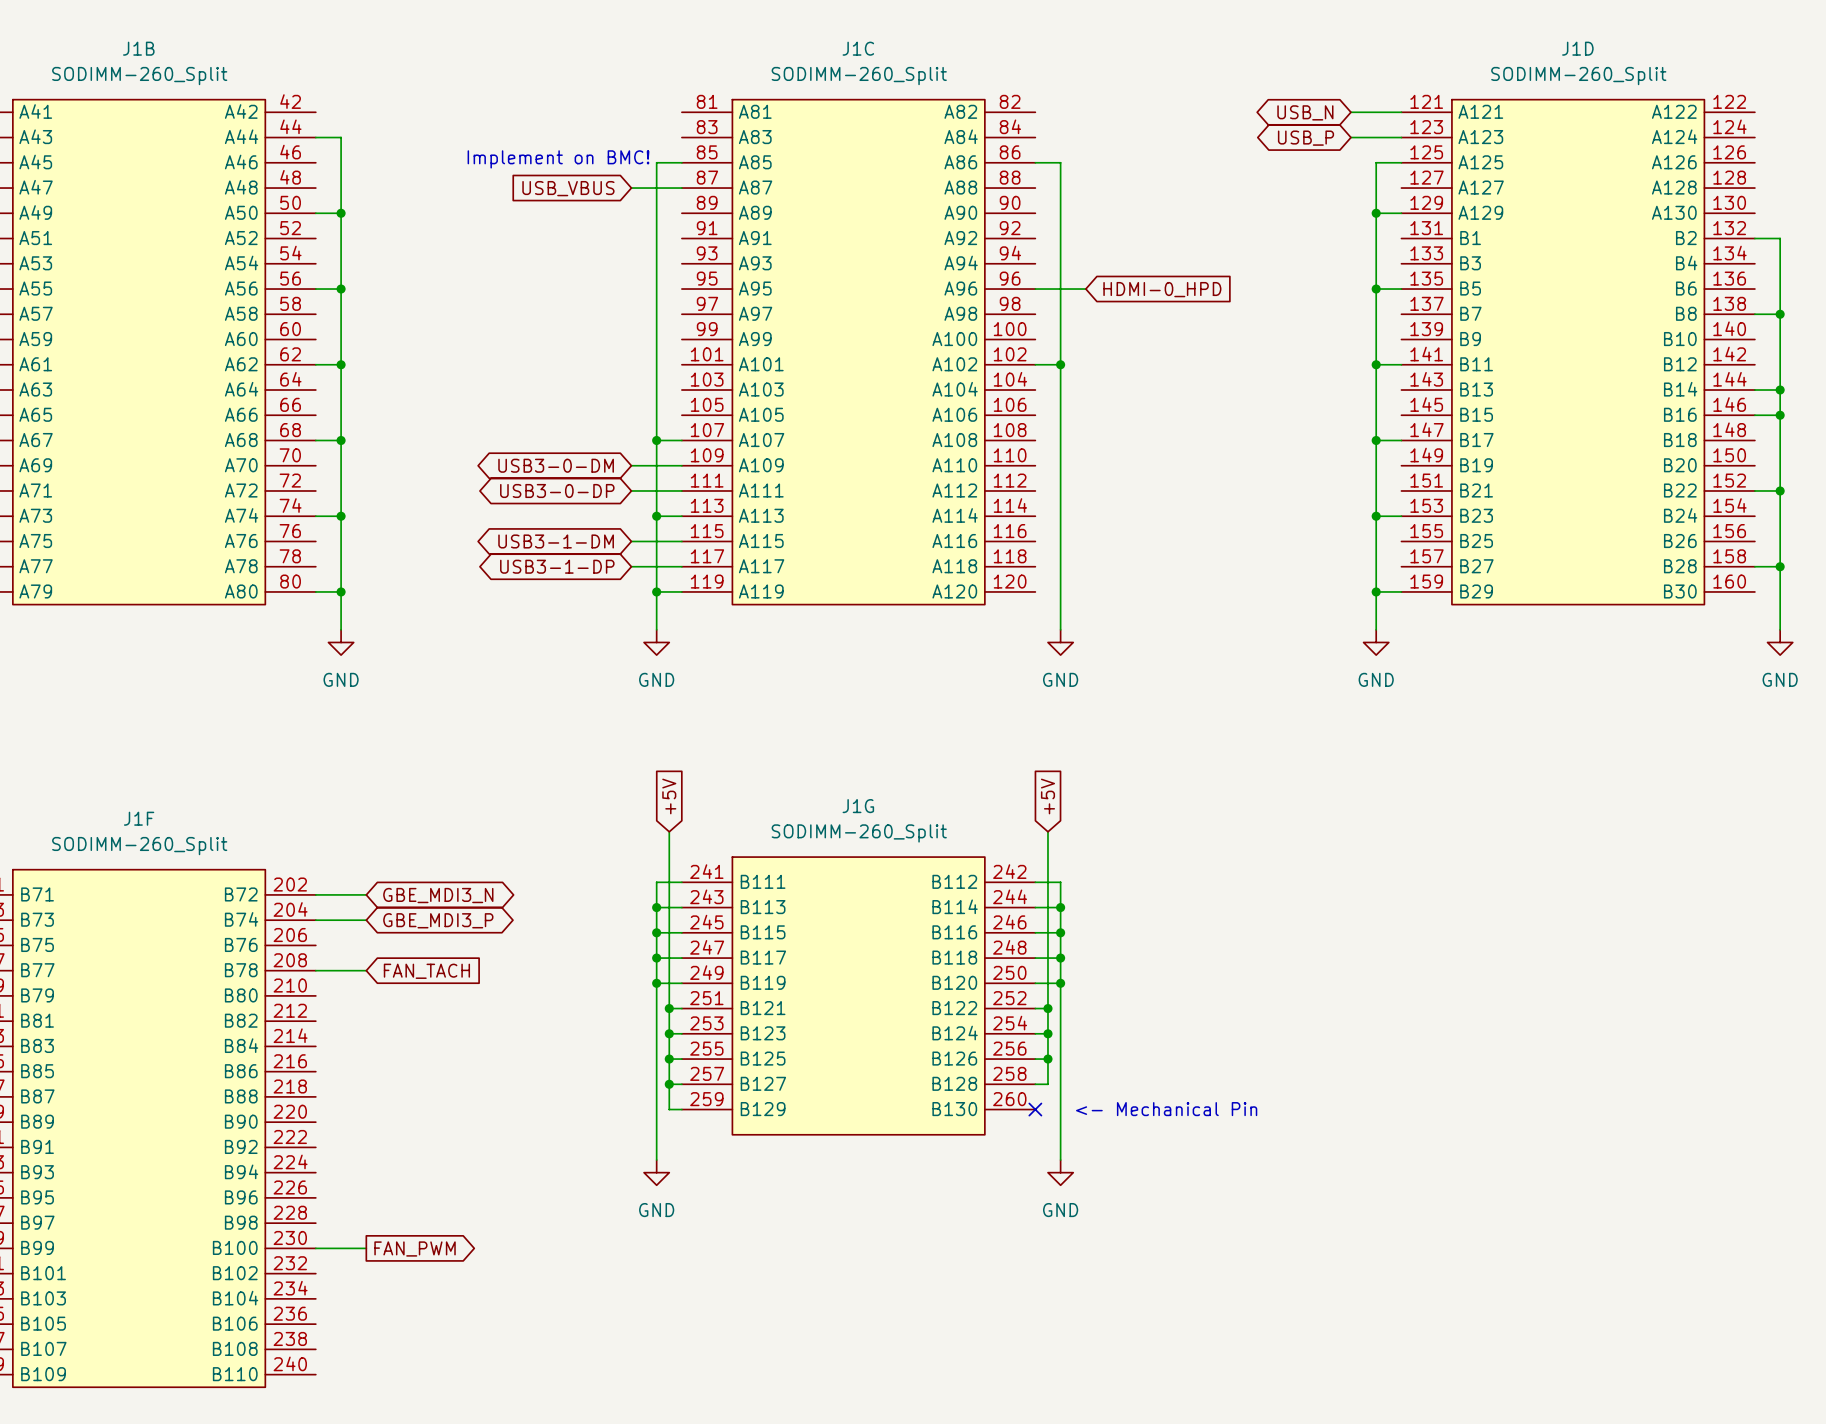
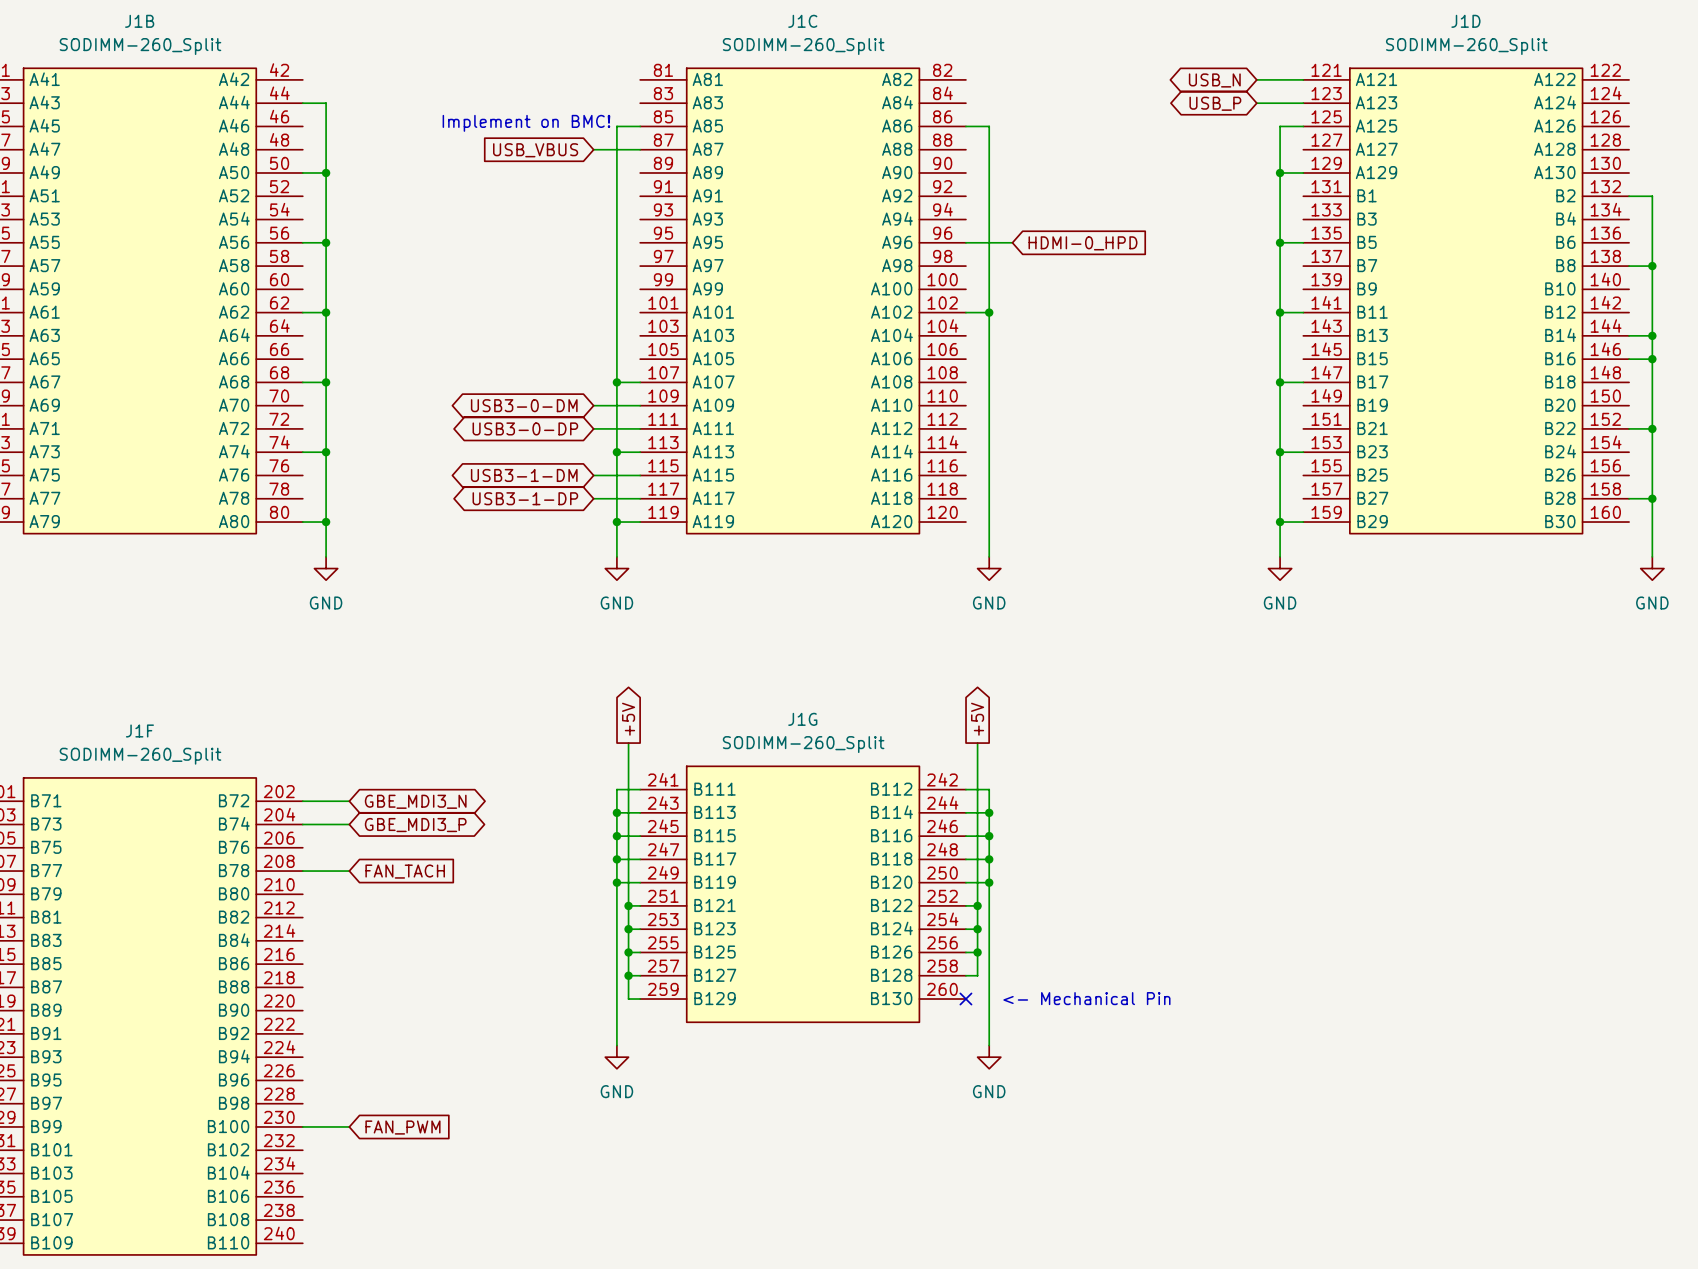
global label shape: input (669, 796) -> output (628, 719)
global label shape: input (1047, 796) -> output (977, 719)
global label shape: output (415, 1248) -> input (402, 1127)

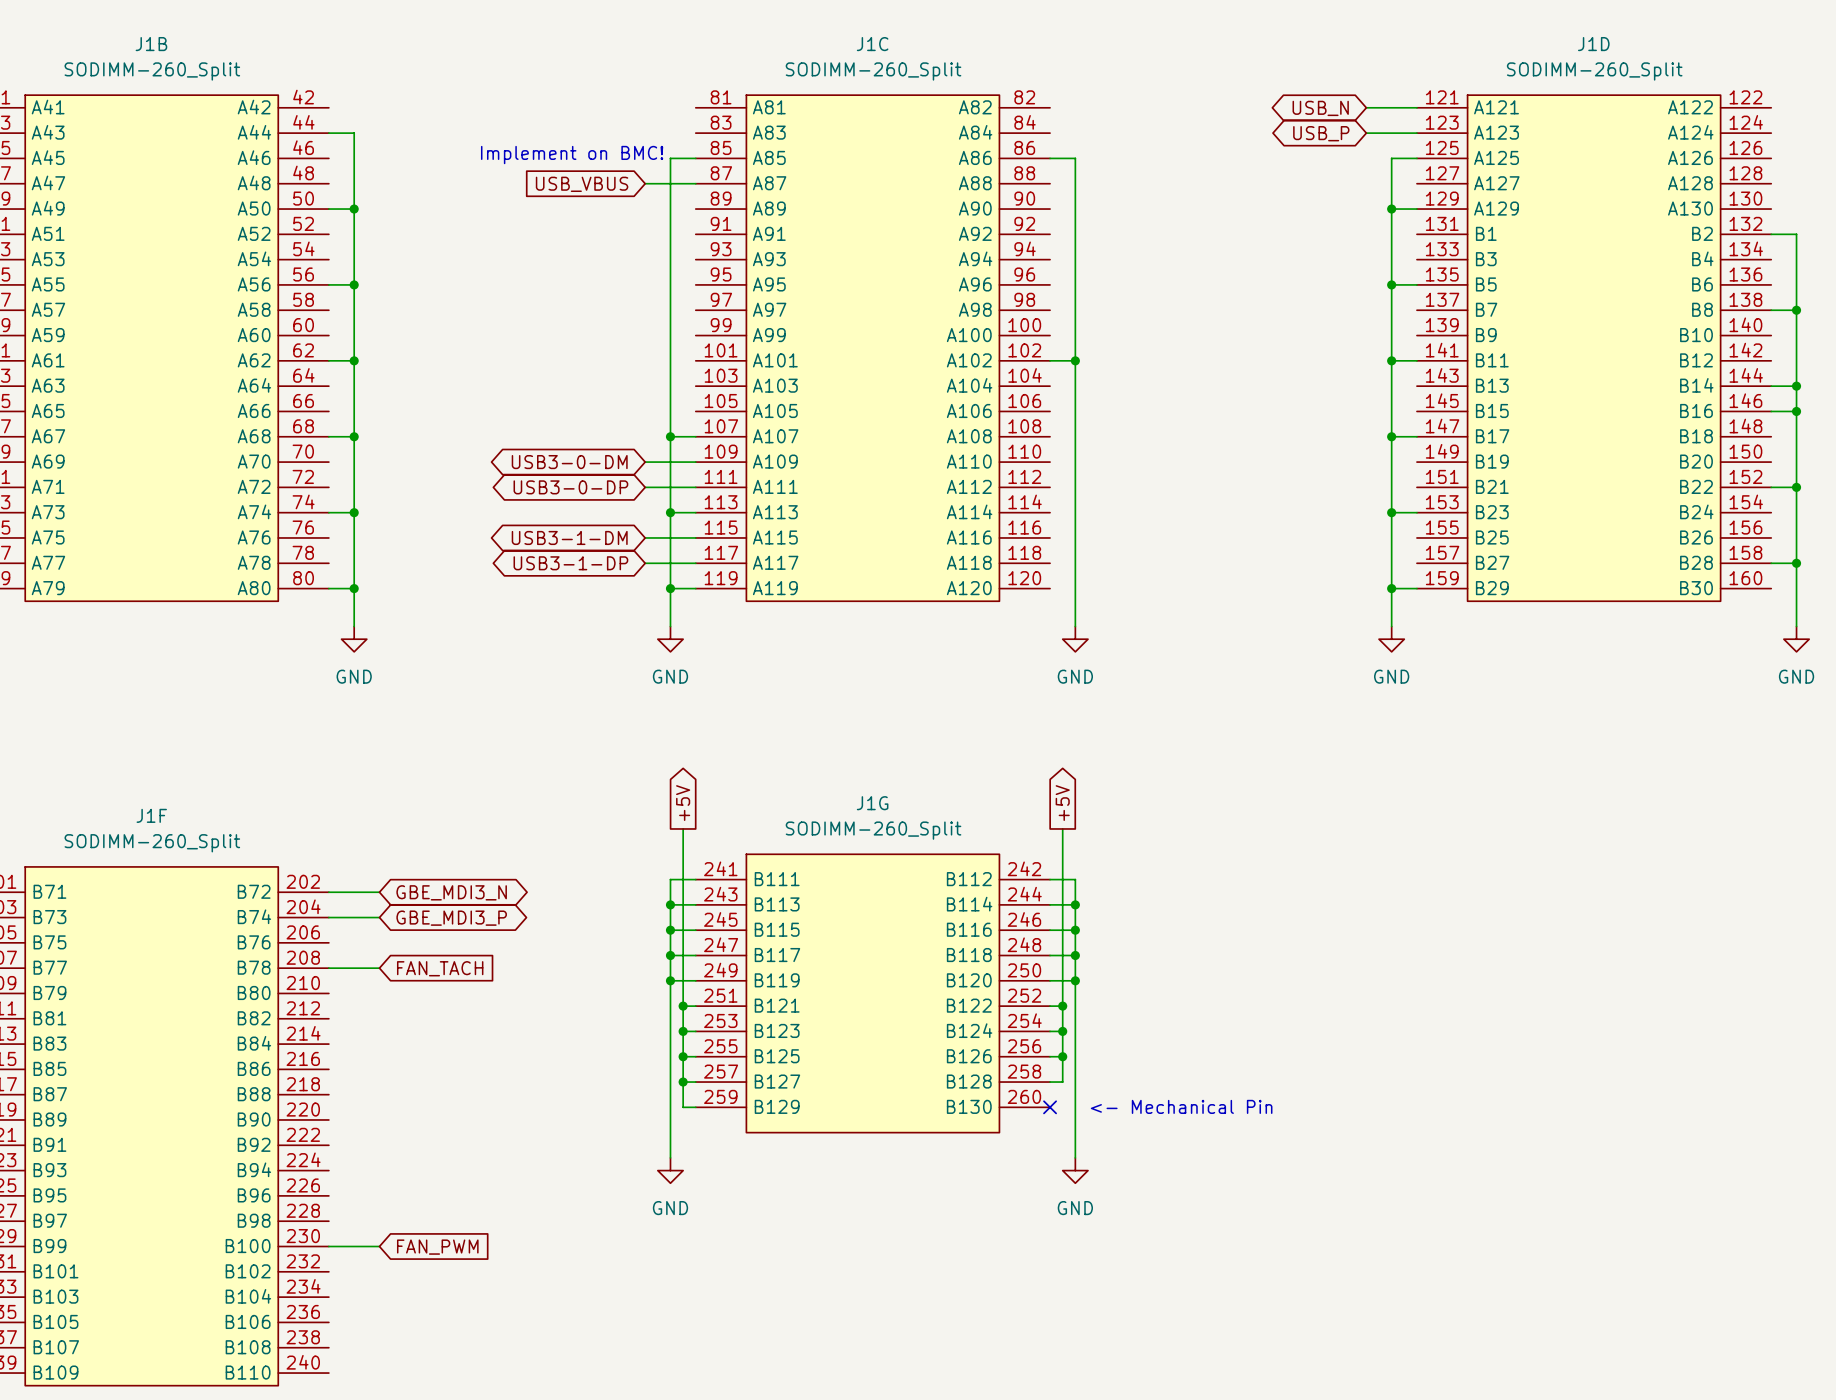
wire: (965, 242) (1012, 242) -> none
global label: HDMI-0_HPD (1082, 243) -> none

